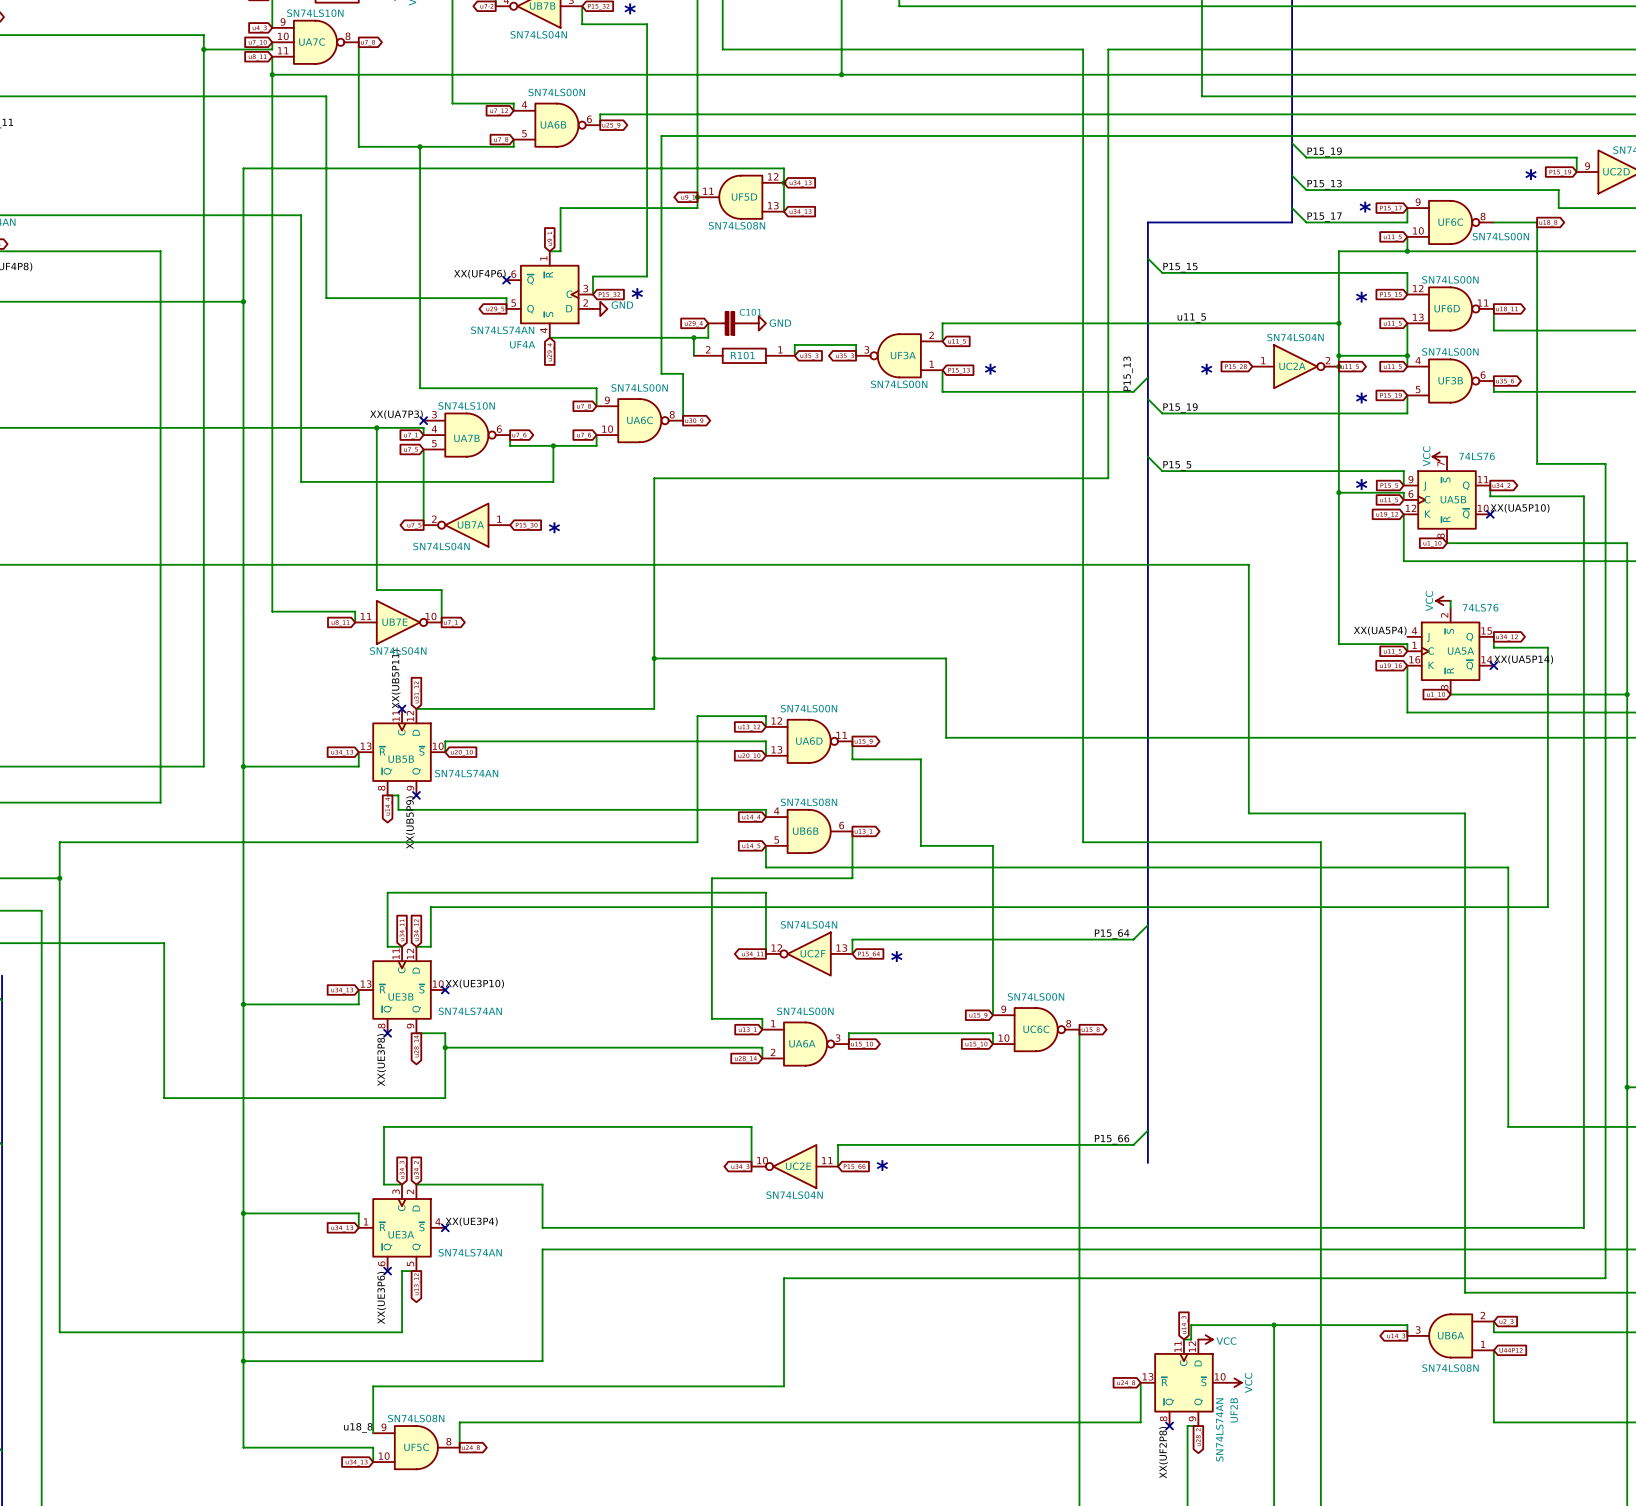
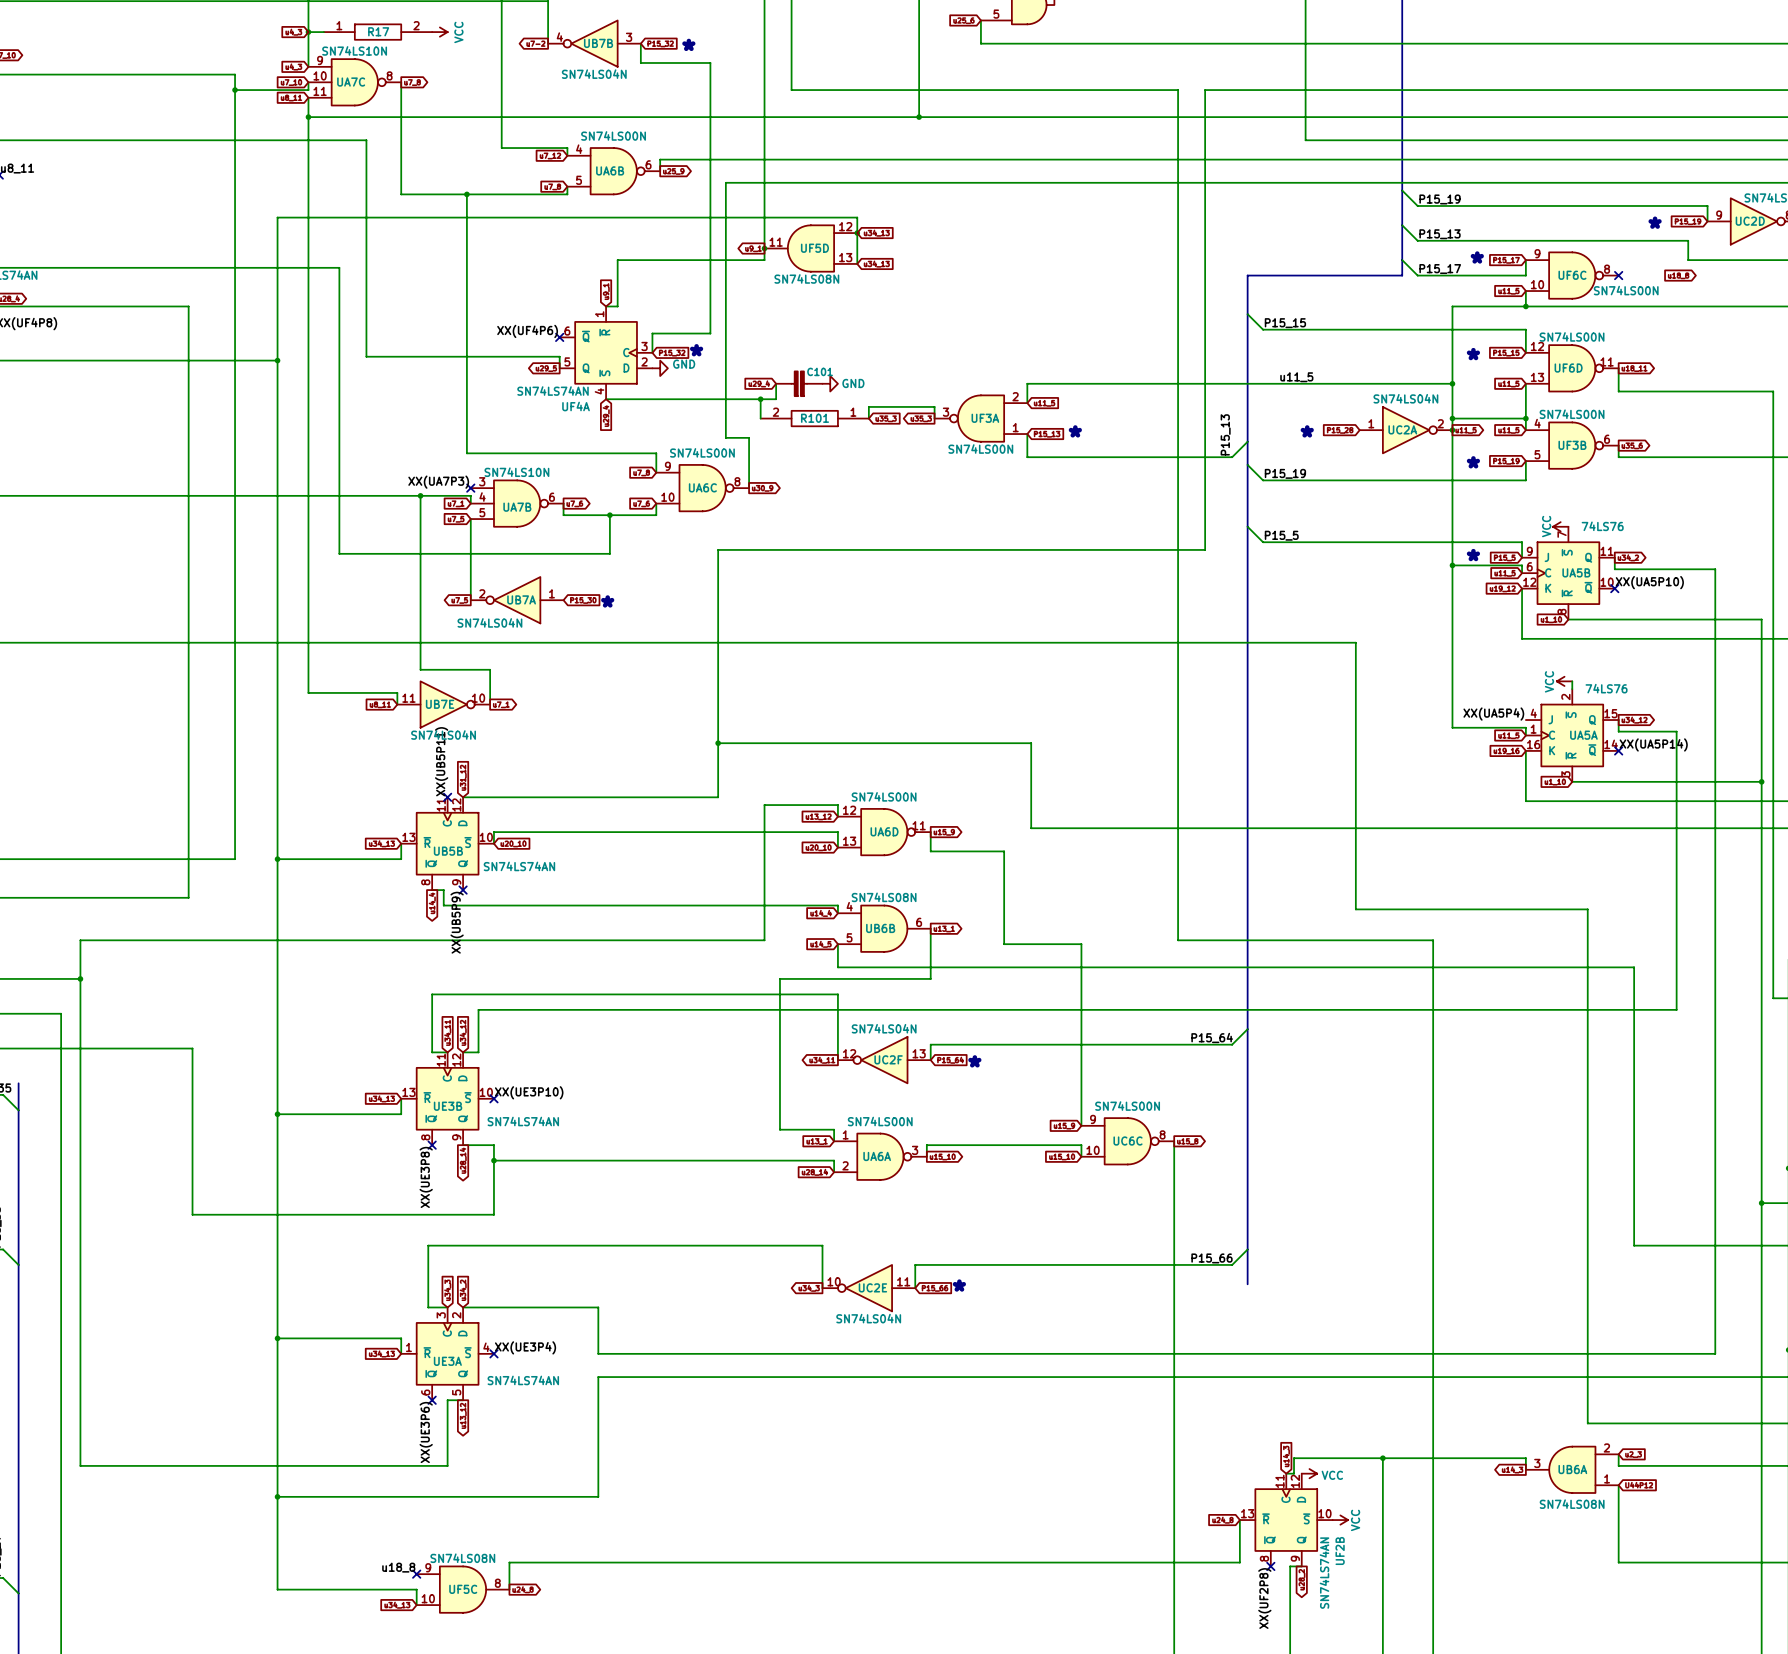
wire: (1493, 222) (1537, 222) (1537, 463) (1605, 463) (1605, 1278) (783, 1278) (783, 1386) (373, 1386) (373, 1433) -> none
no-connect mark: none -> (1618, 275)
no-connect mark: none -> (416, 1574)

